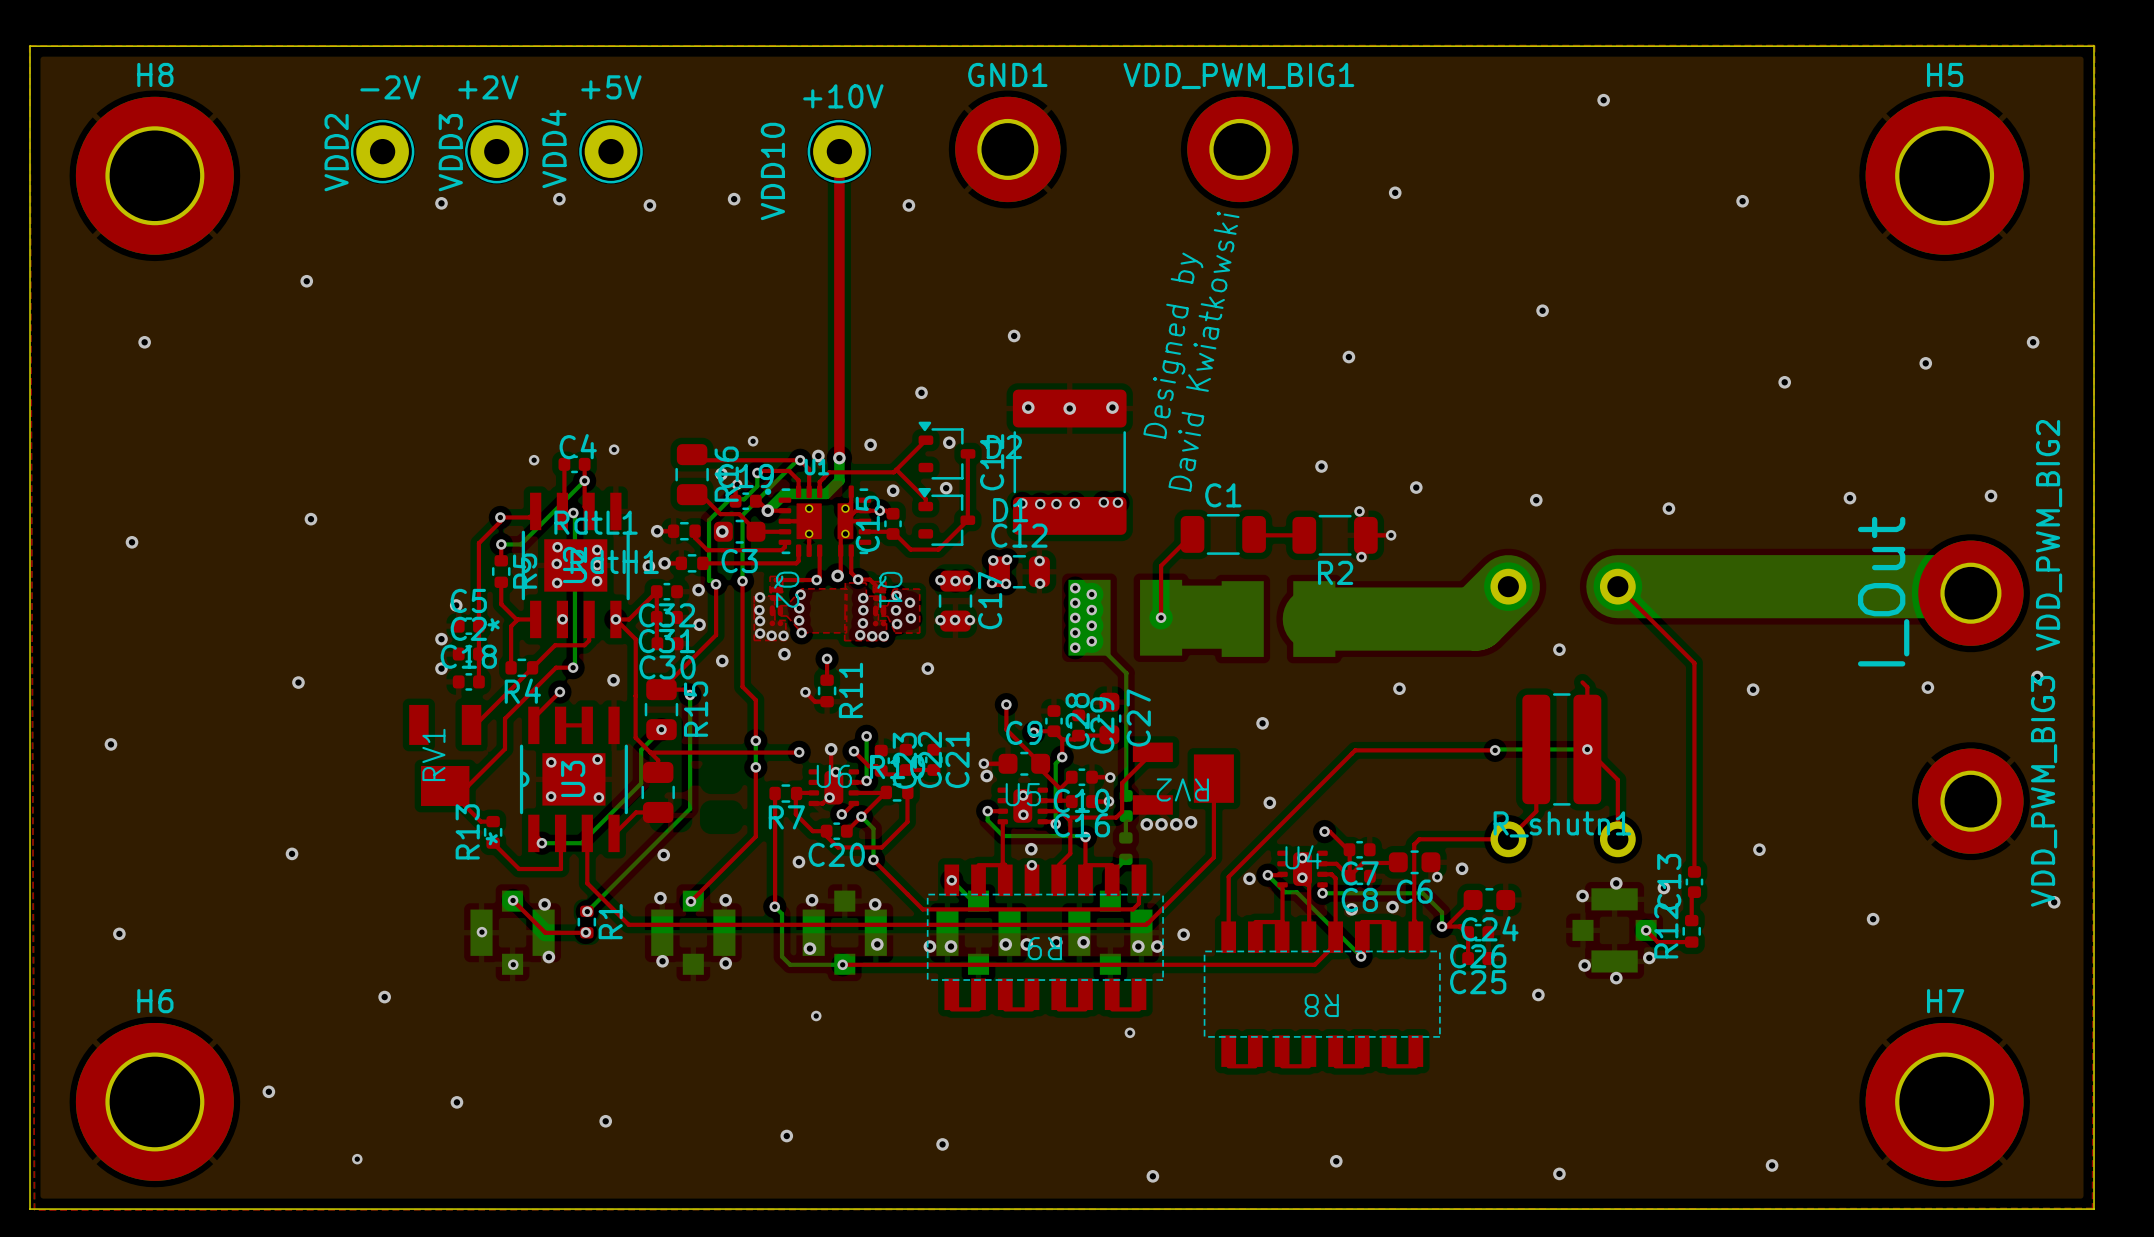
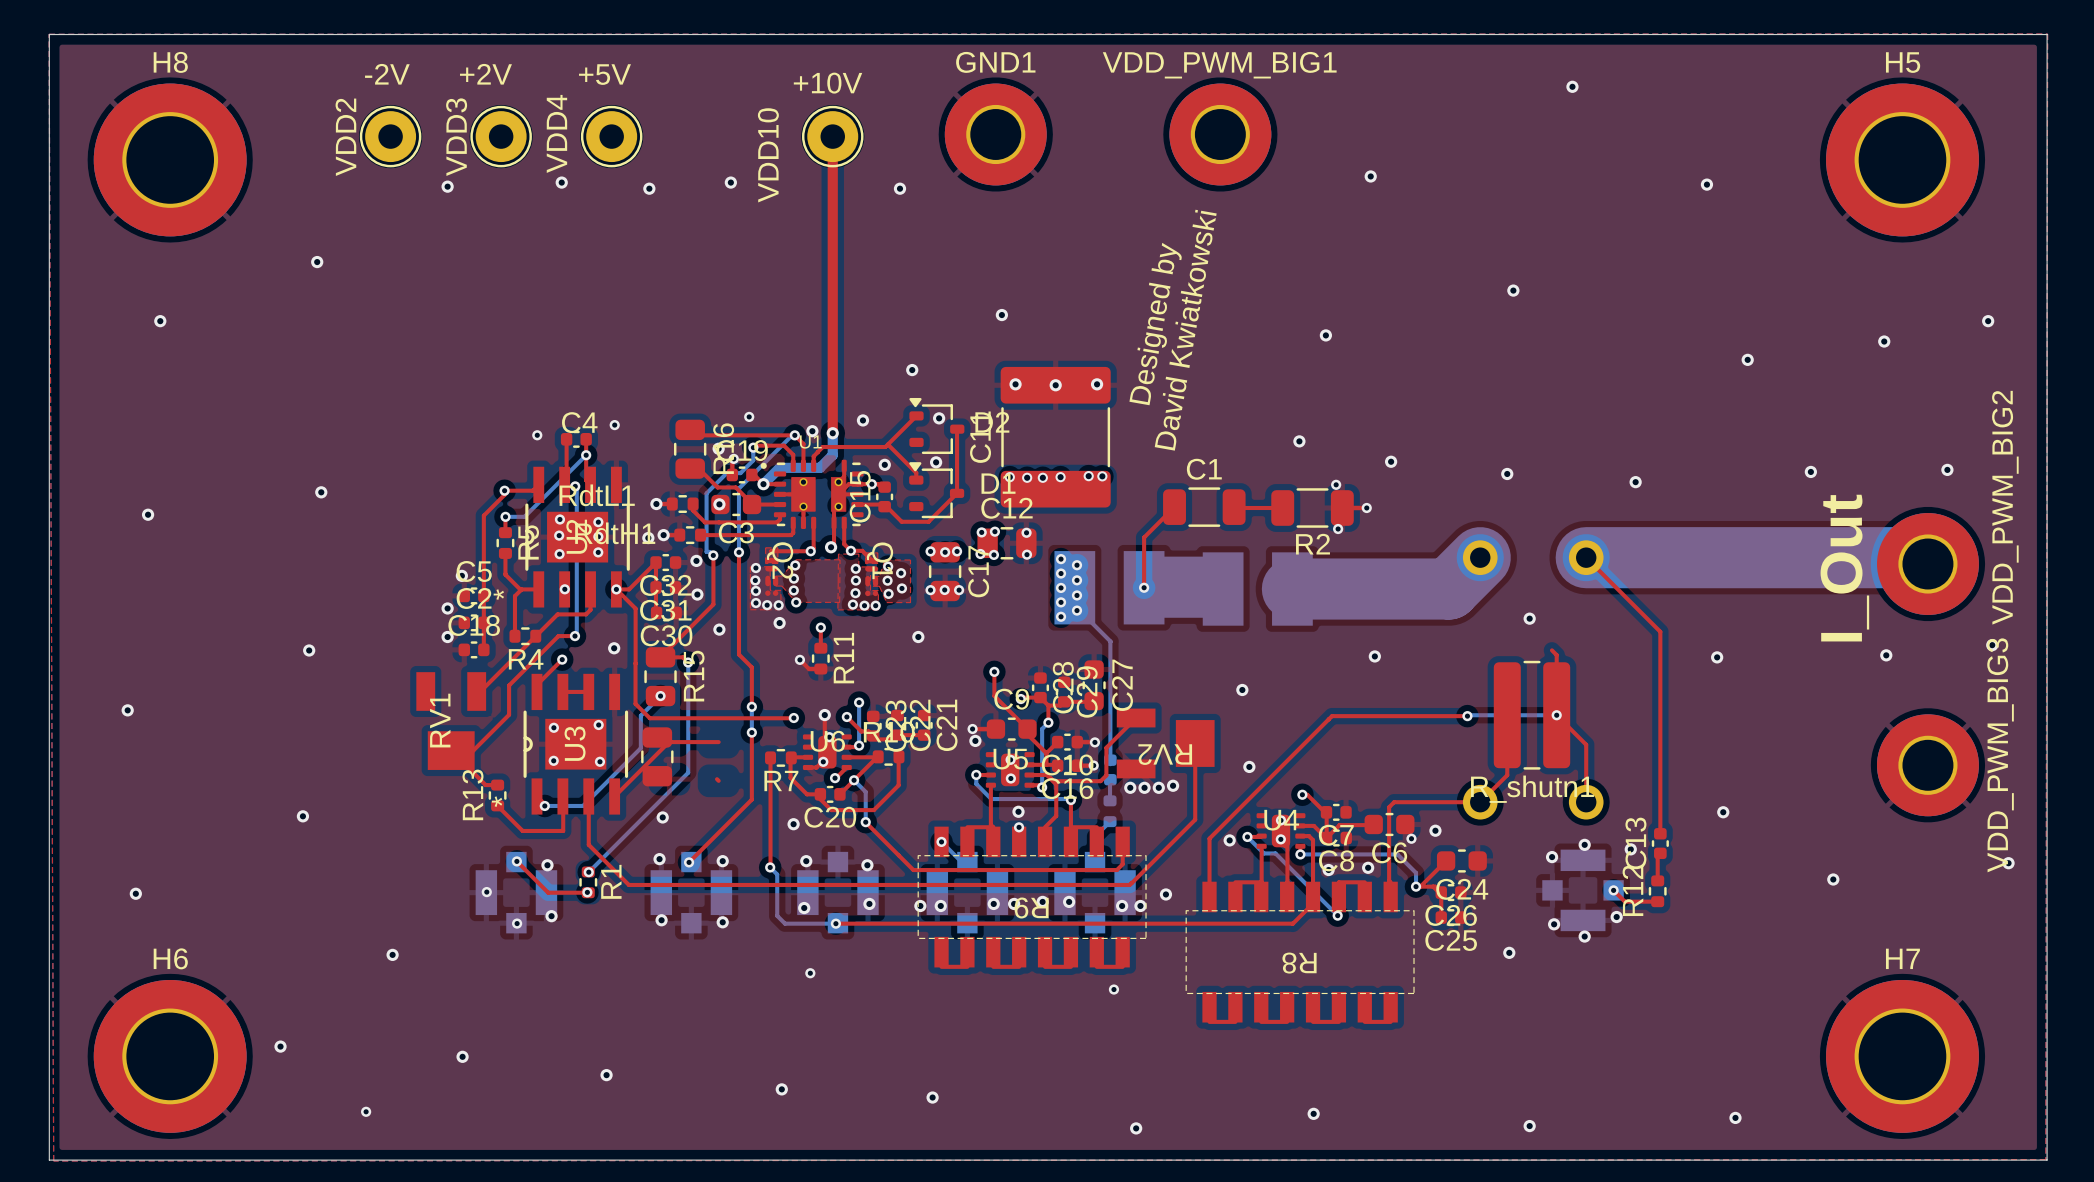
top track: (650, 752) (658, 760) (658, 772) -> none
top track: none -> (718, 742) (671, 742) (669, 740) (614, 796)
top track: (658, 812) (636, 812) (616, 832) -> none
top track: none -> (717, 779) (718, 780)

